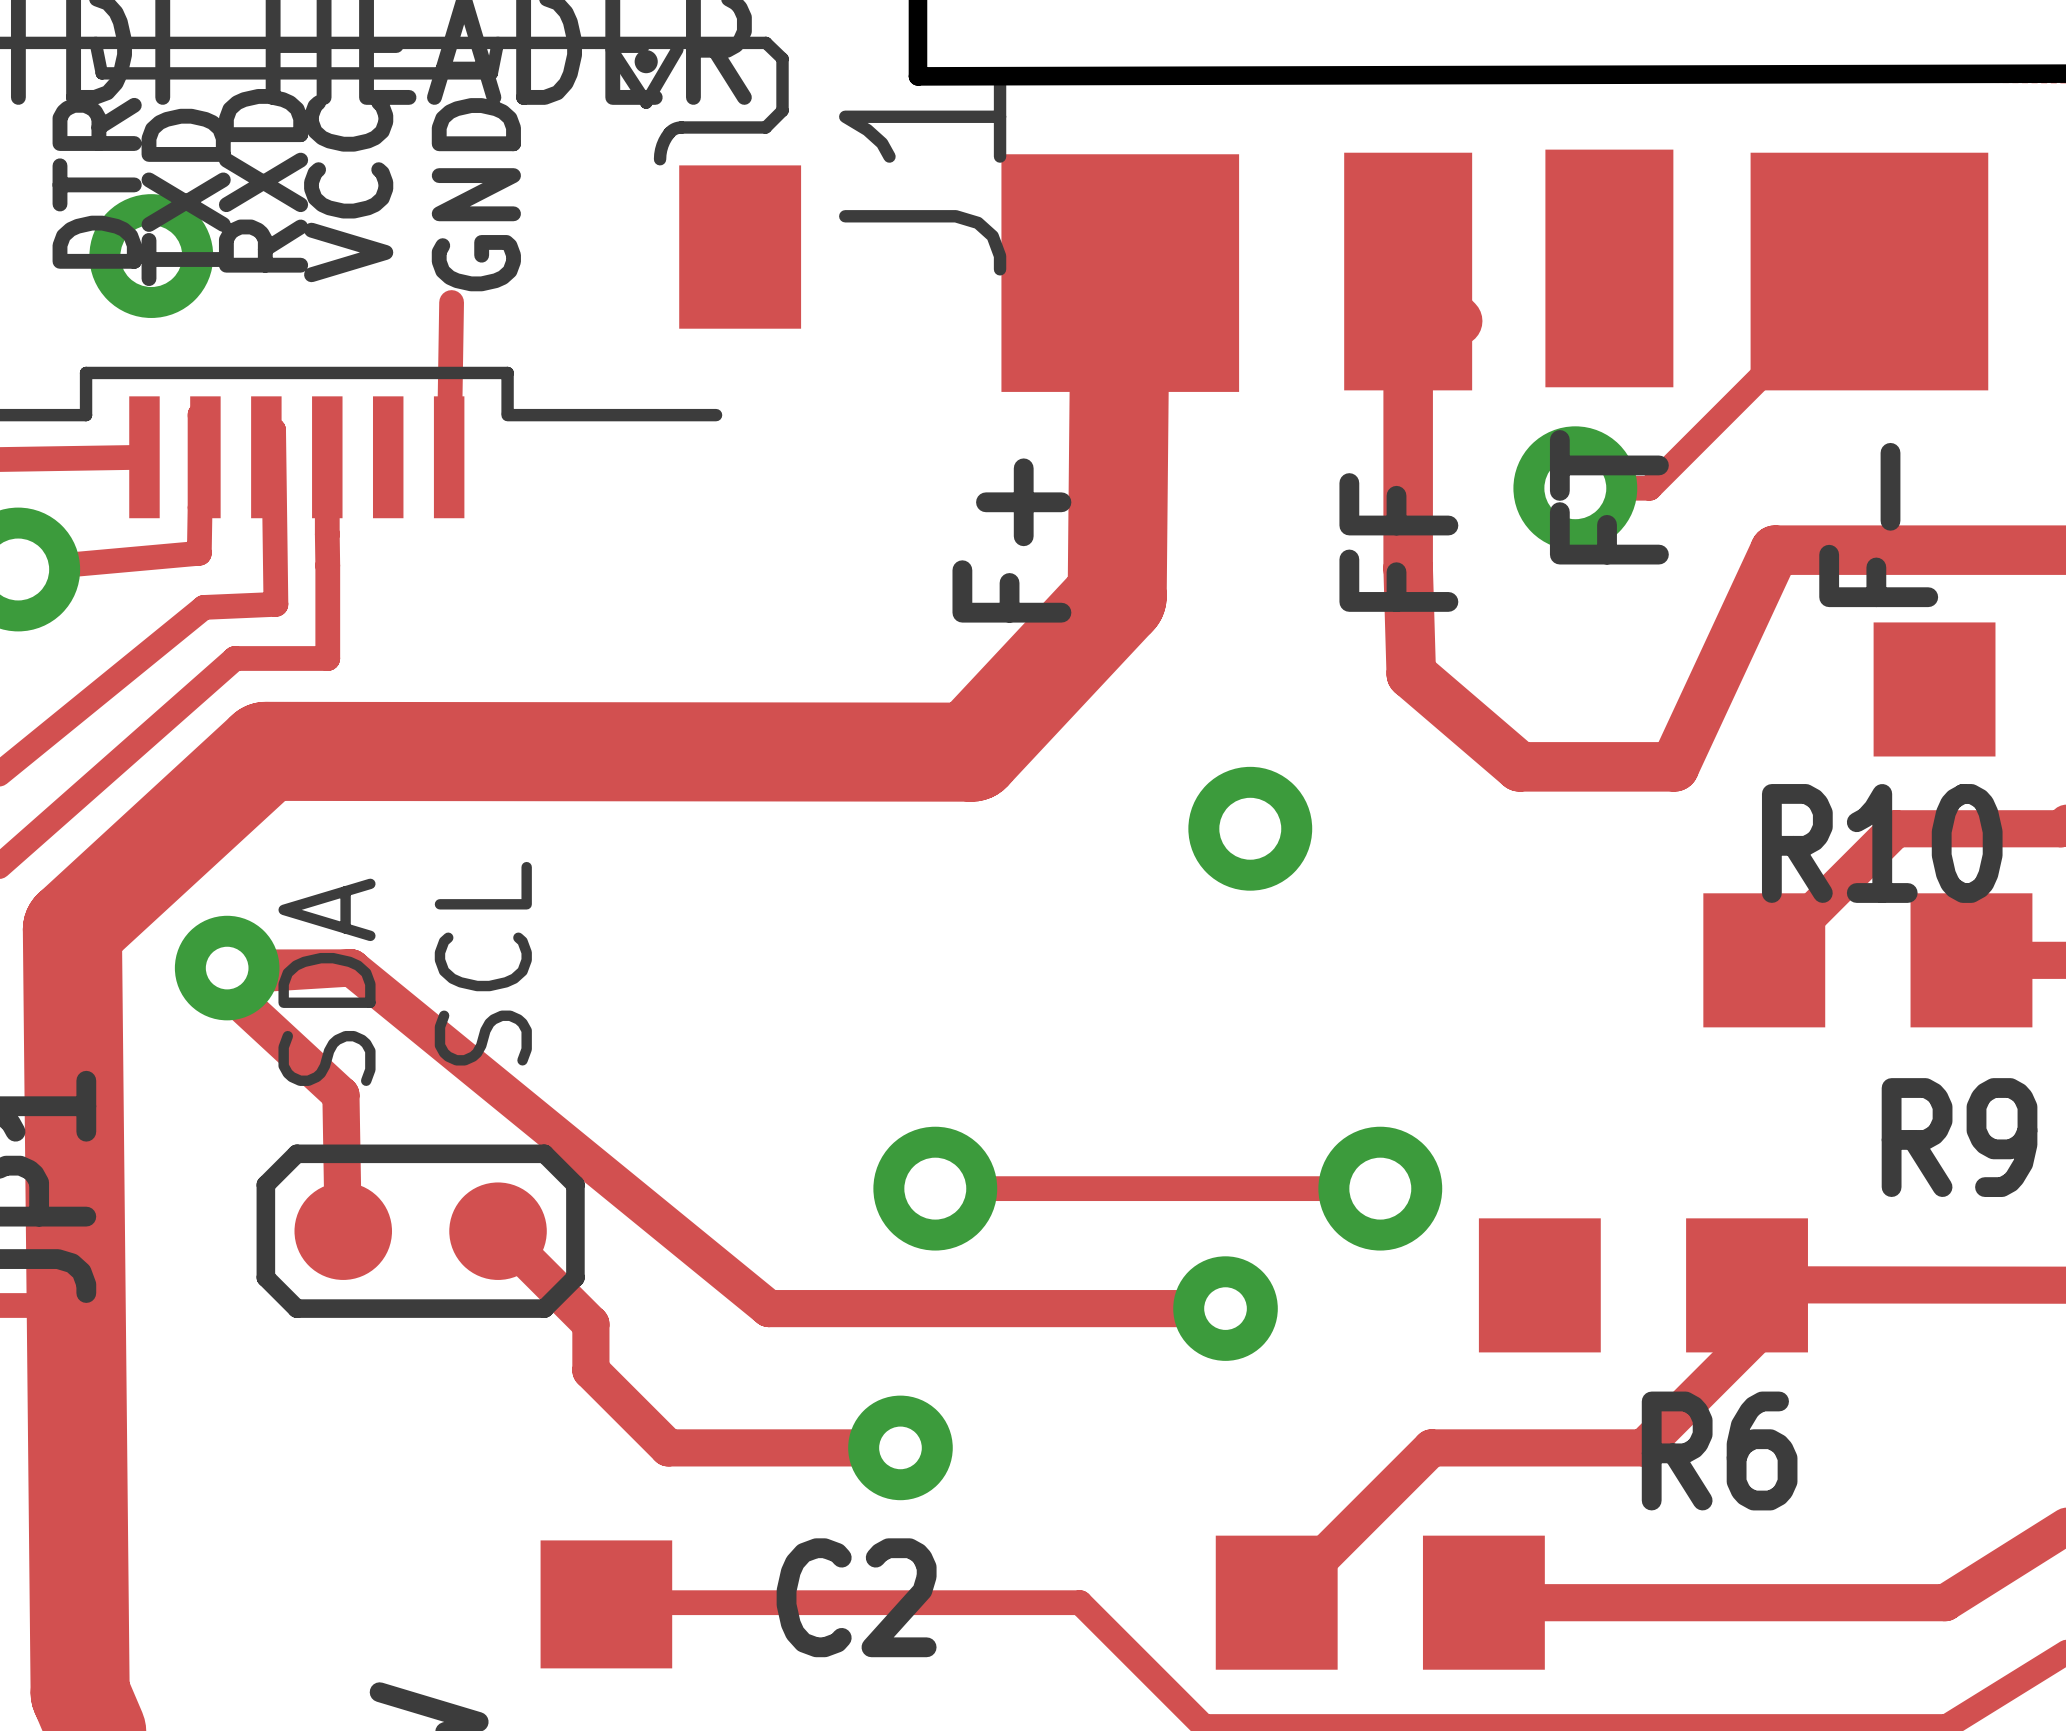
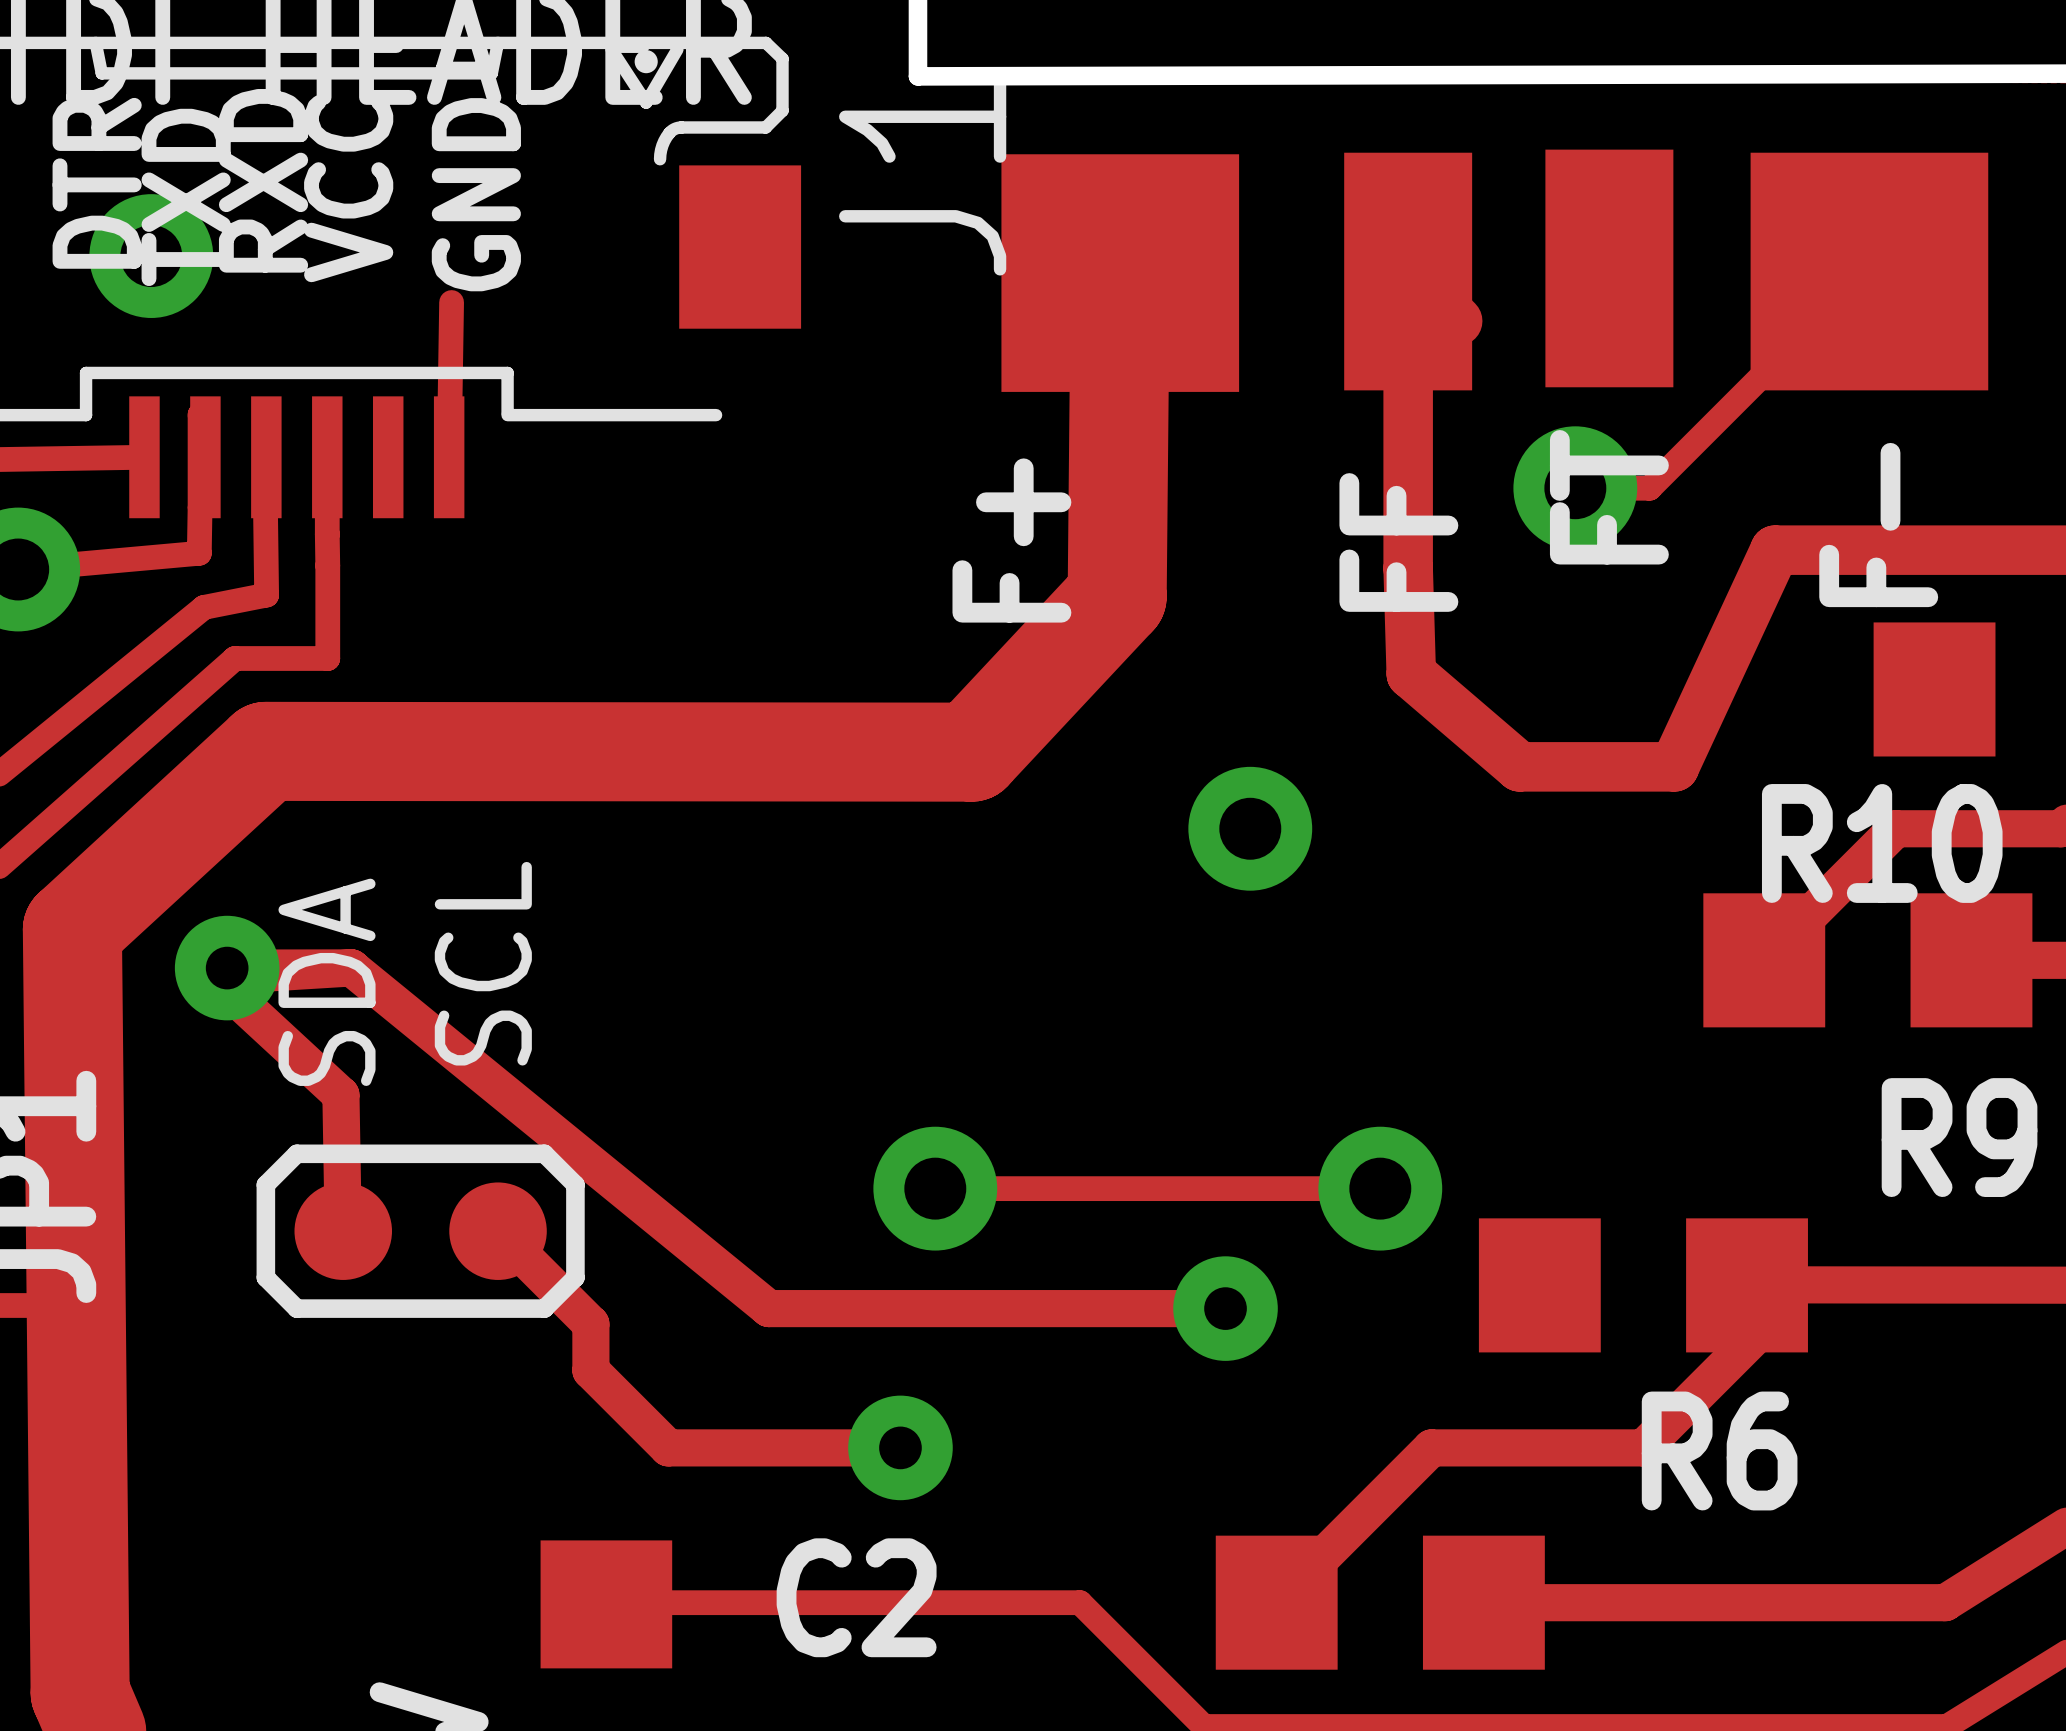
track: (266, 457) (273, 430) (275, 604) (203, 607) -> (266, 457) (264, 420) (266, 595) (203, 607)

